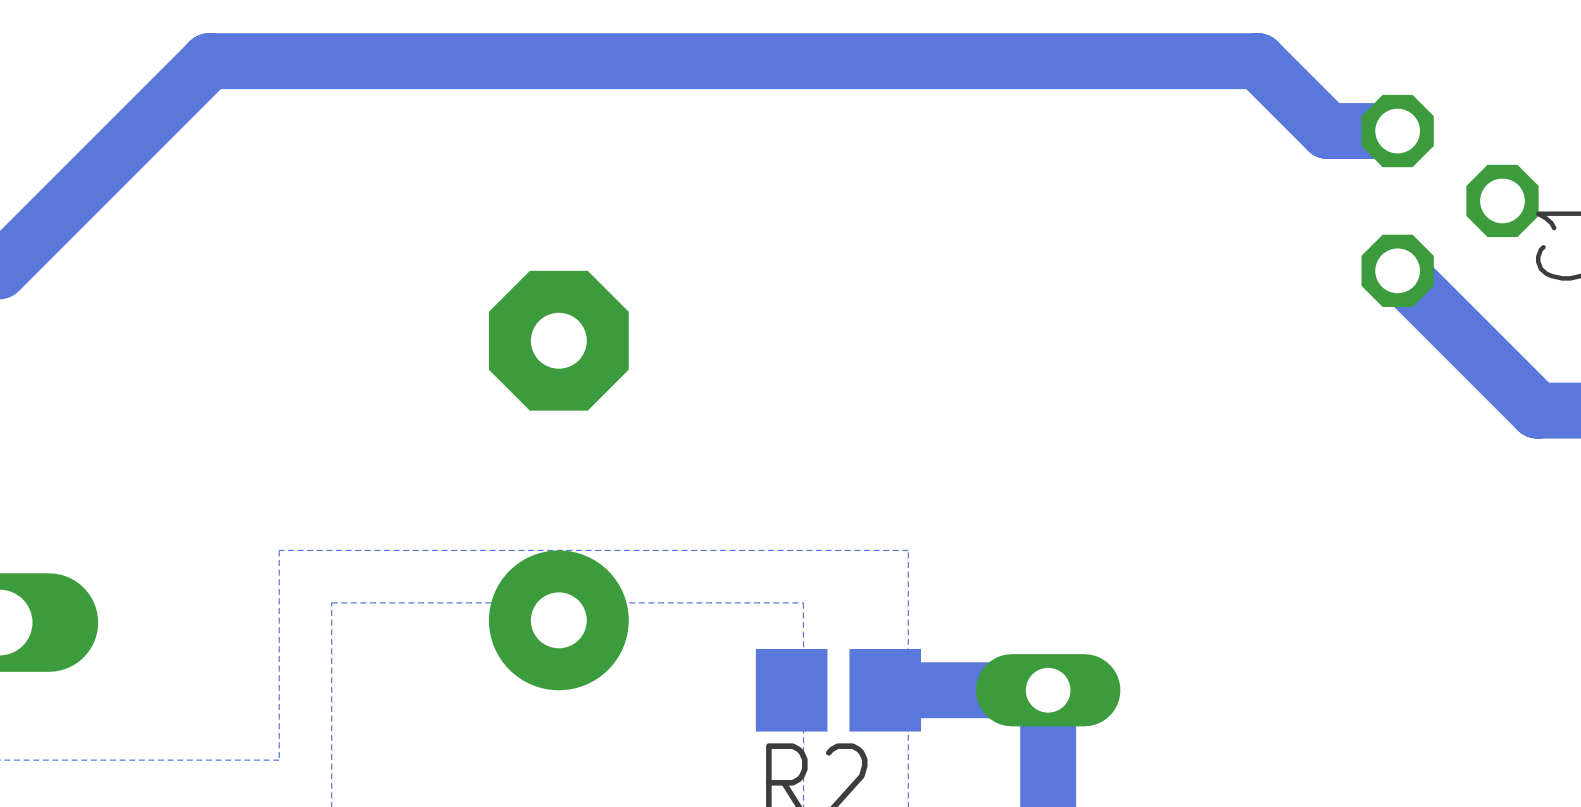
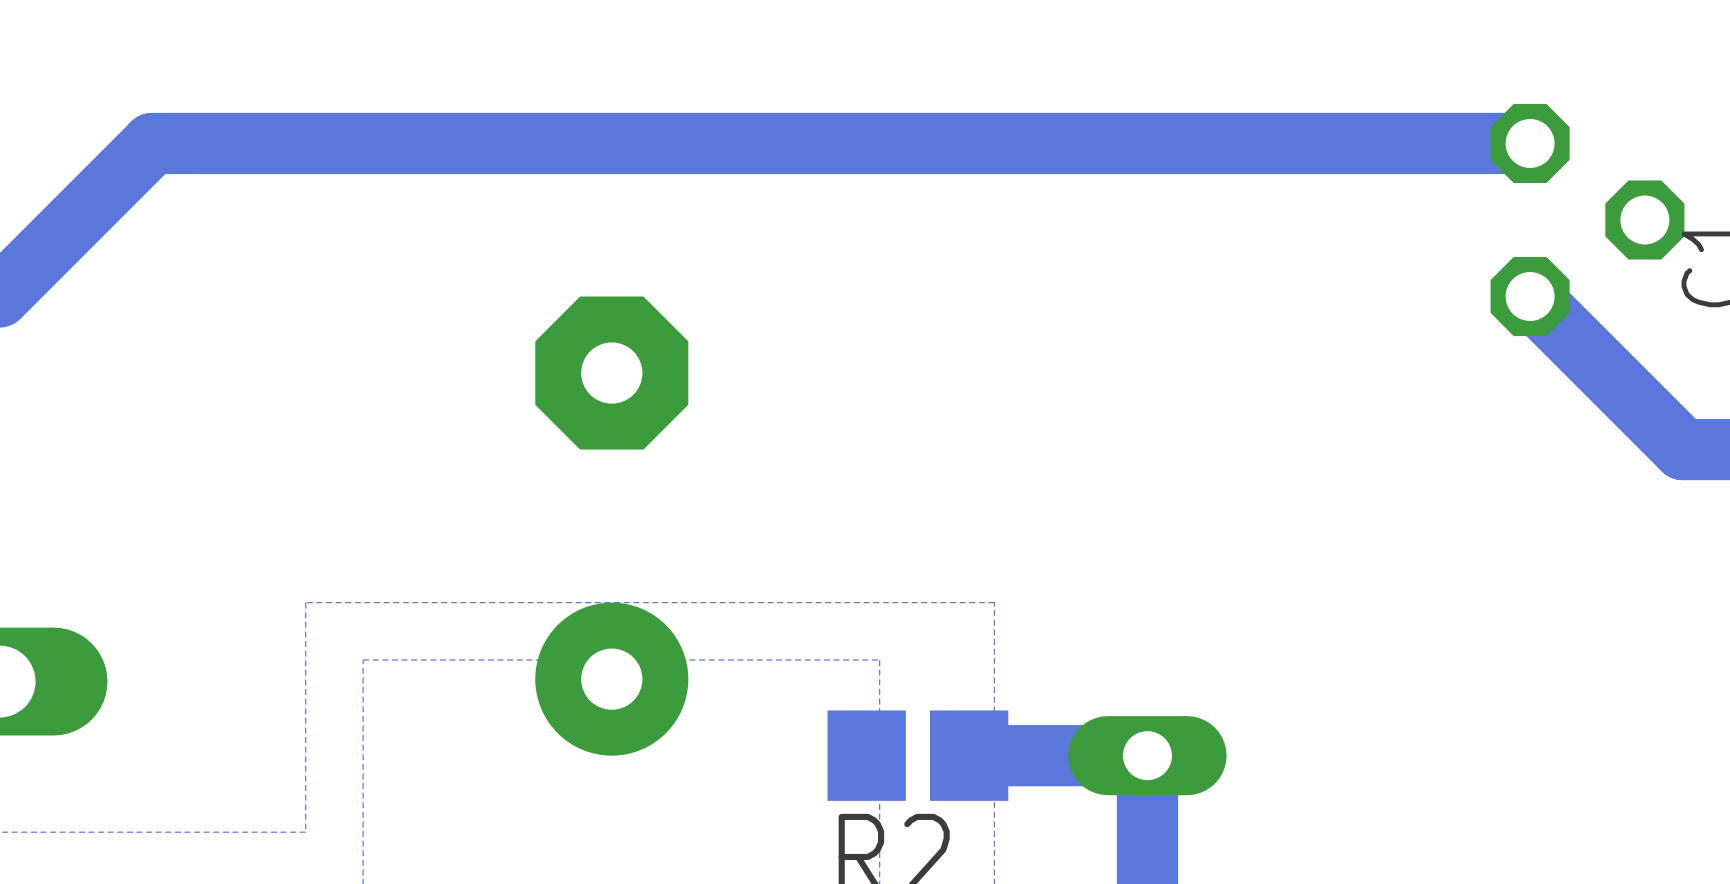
track: (1327, 131) (1257, 61) (209, 61) (139, 131) -> (1453, 143) (152, 143)

